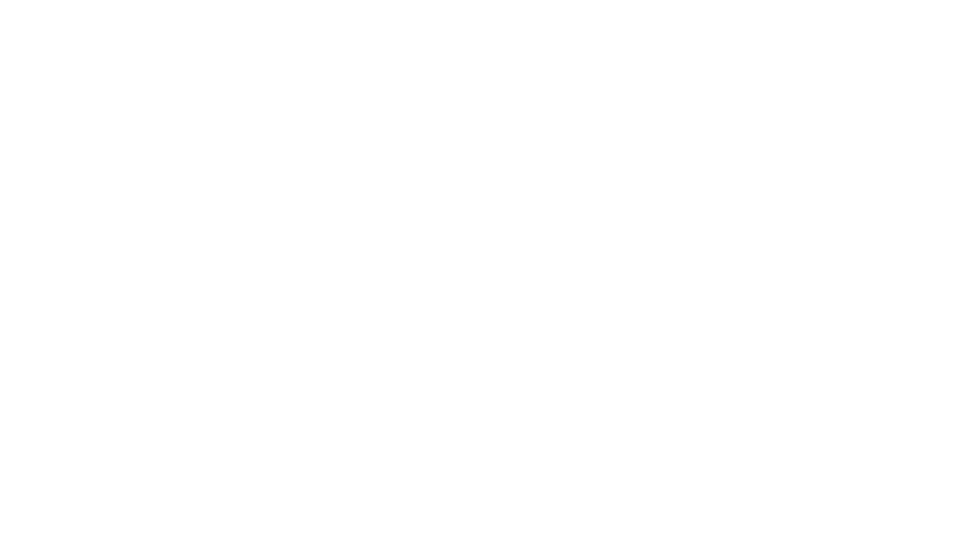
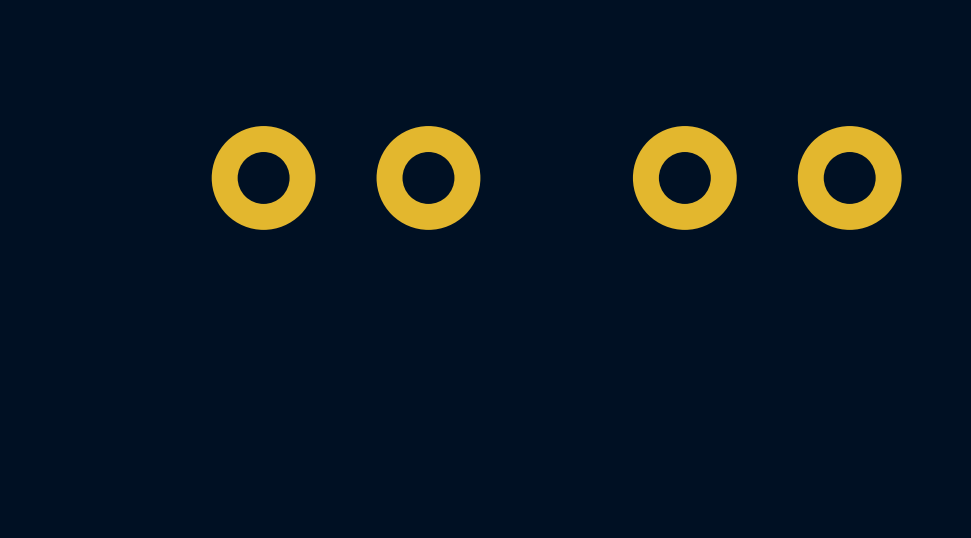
part: none -> (346, 177)
part: none -> (767, 177)

